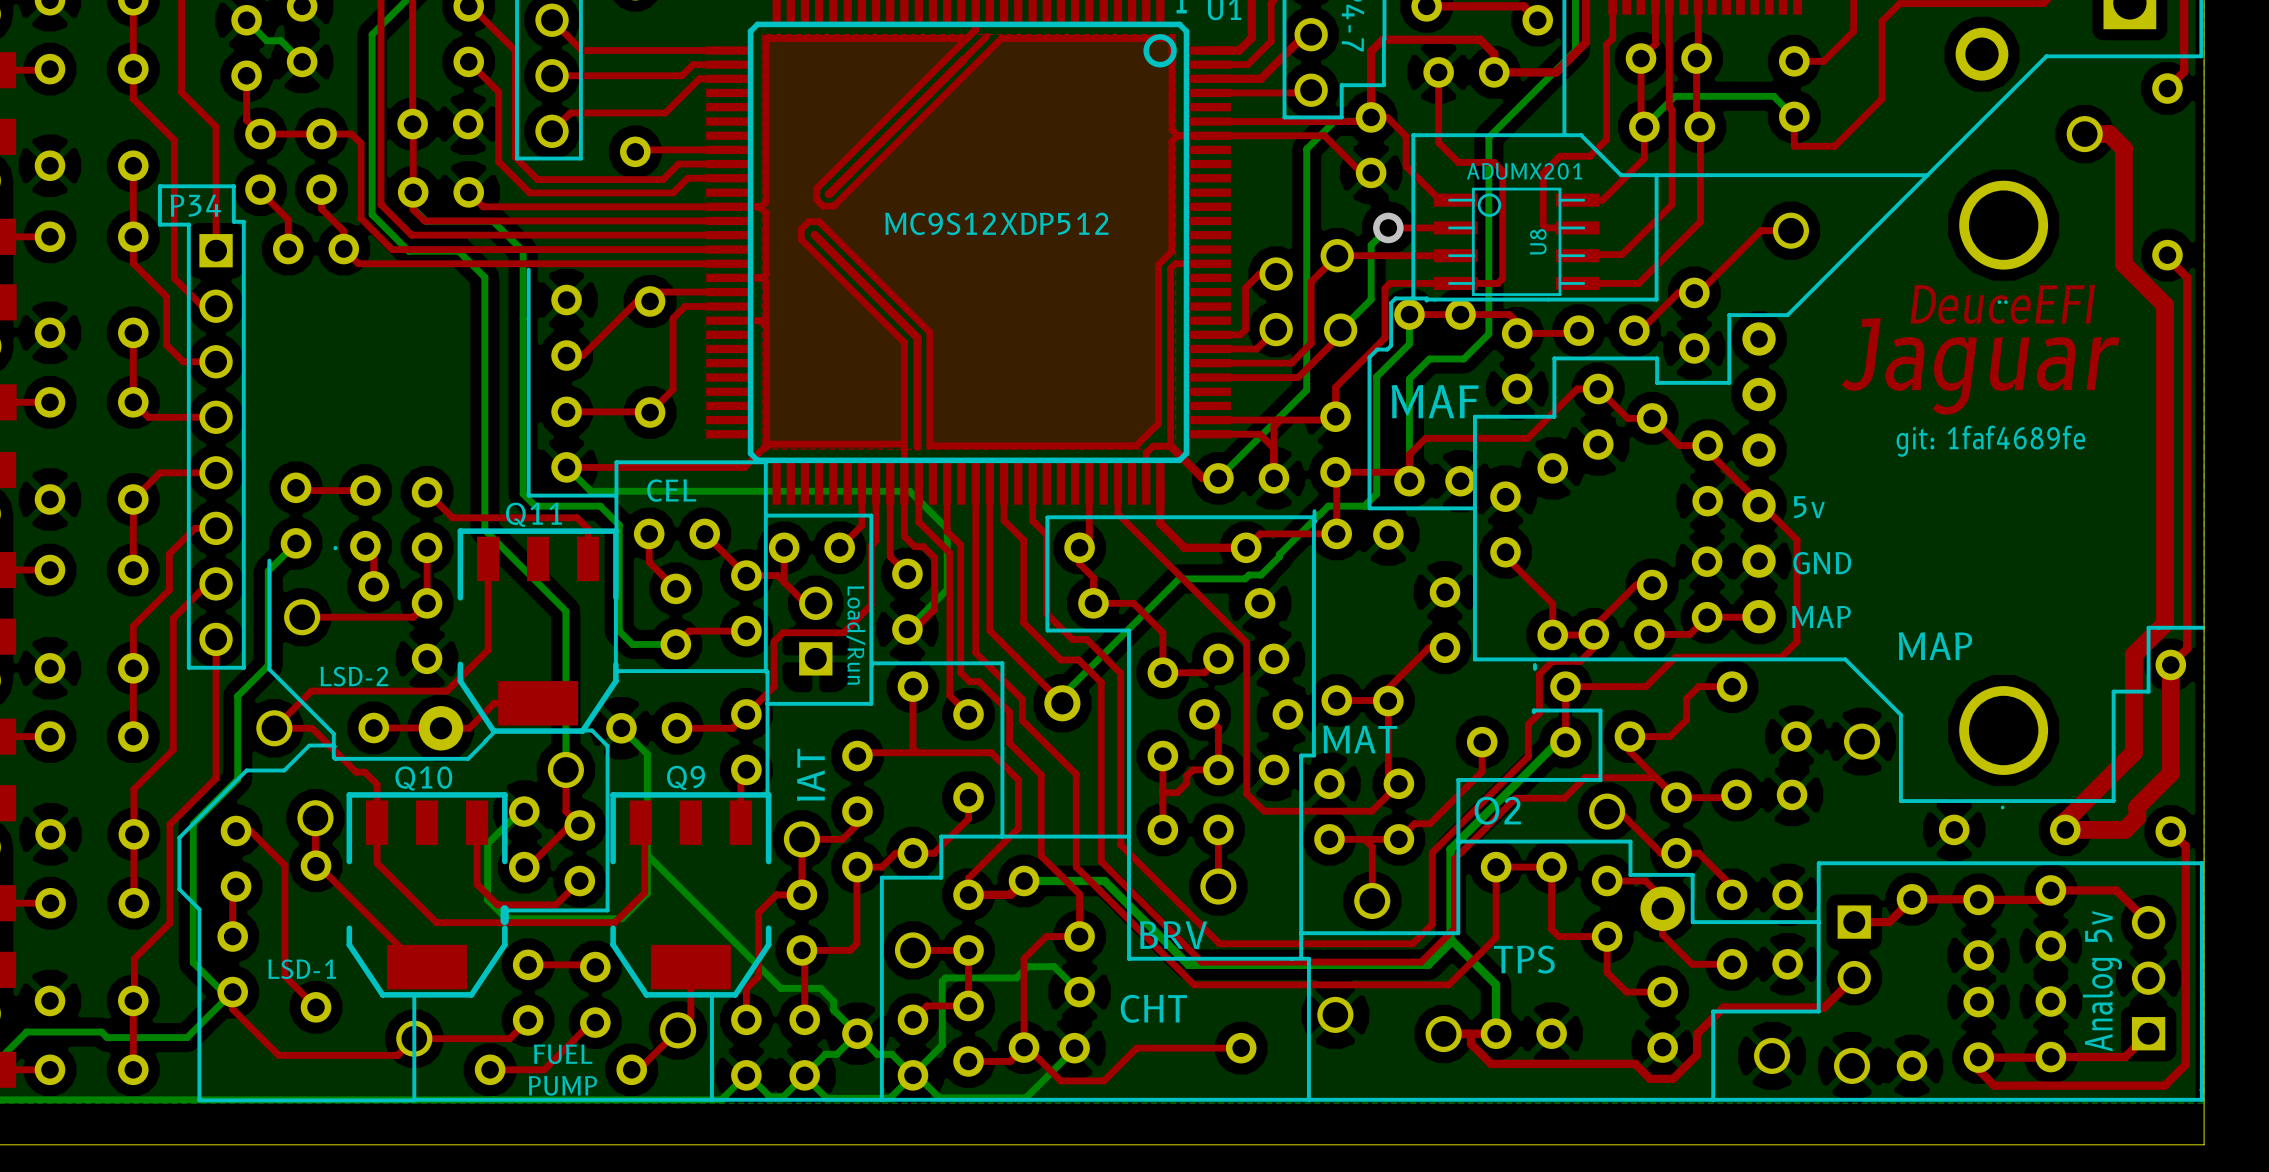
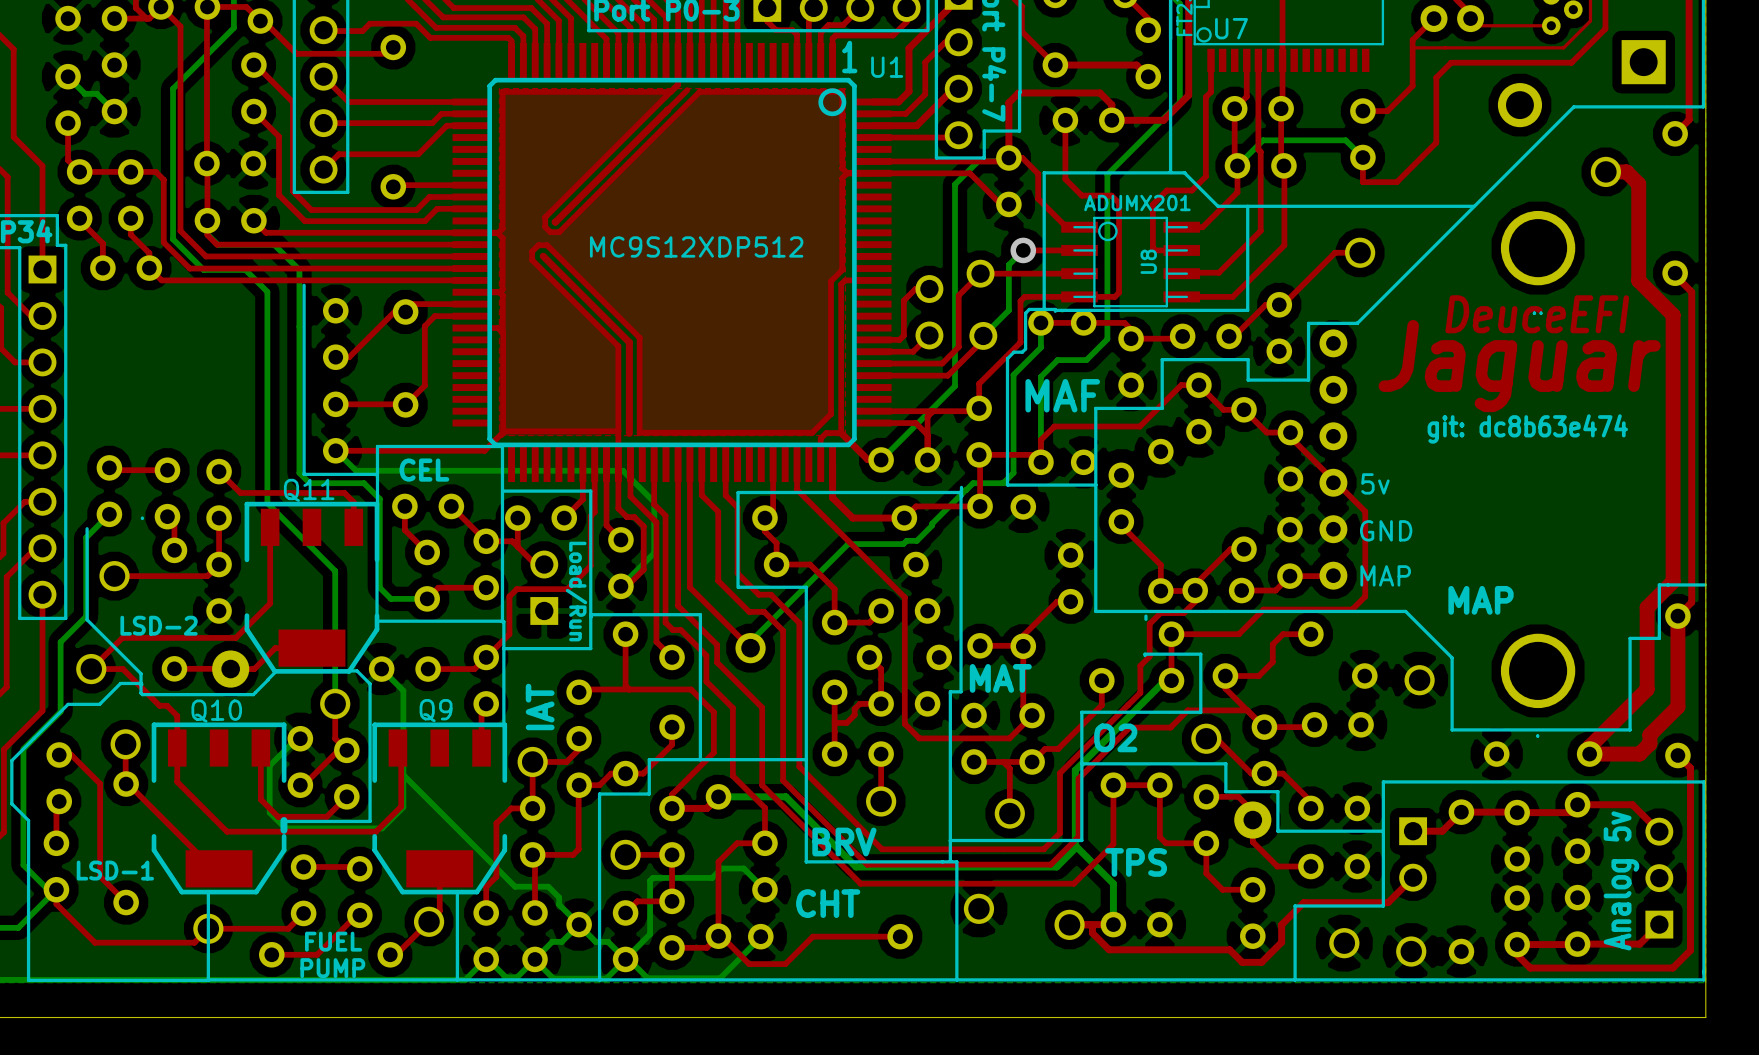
text: git: 1faf4689fe (1990, 441) -> git: dc8b63e474 (1527, 428)

